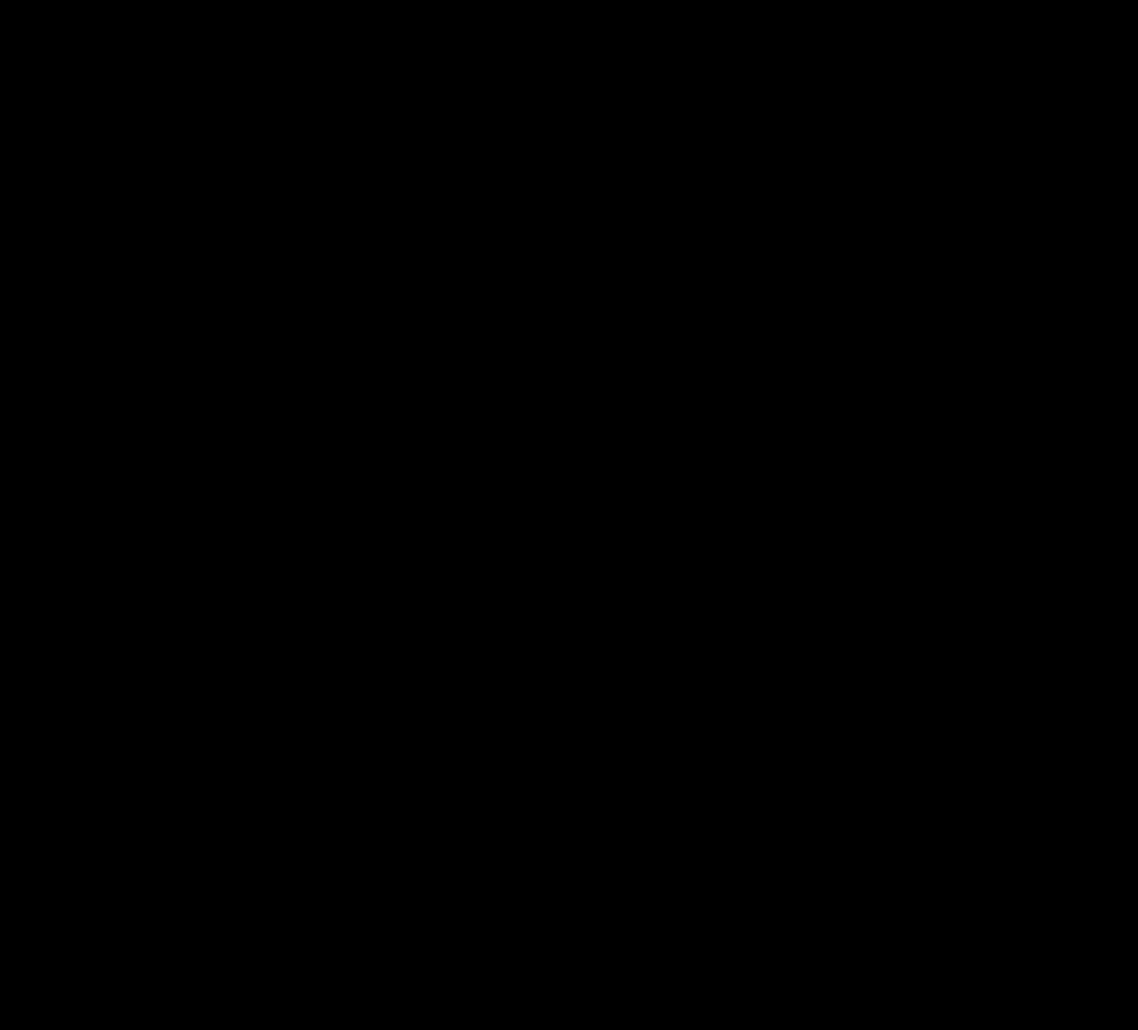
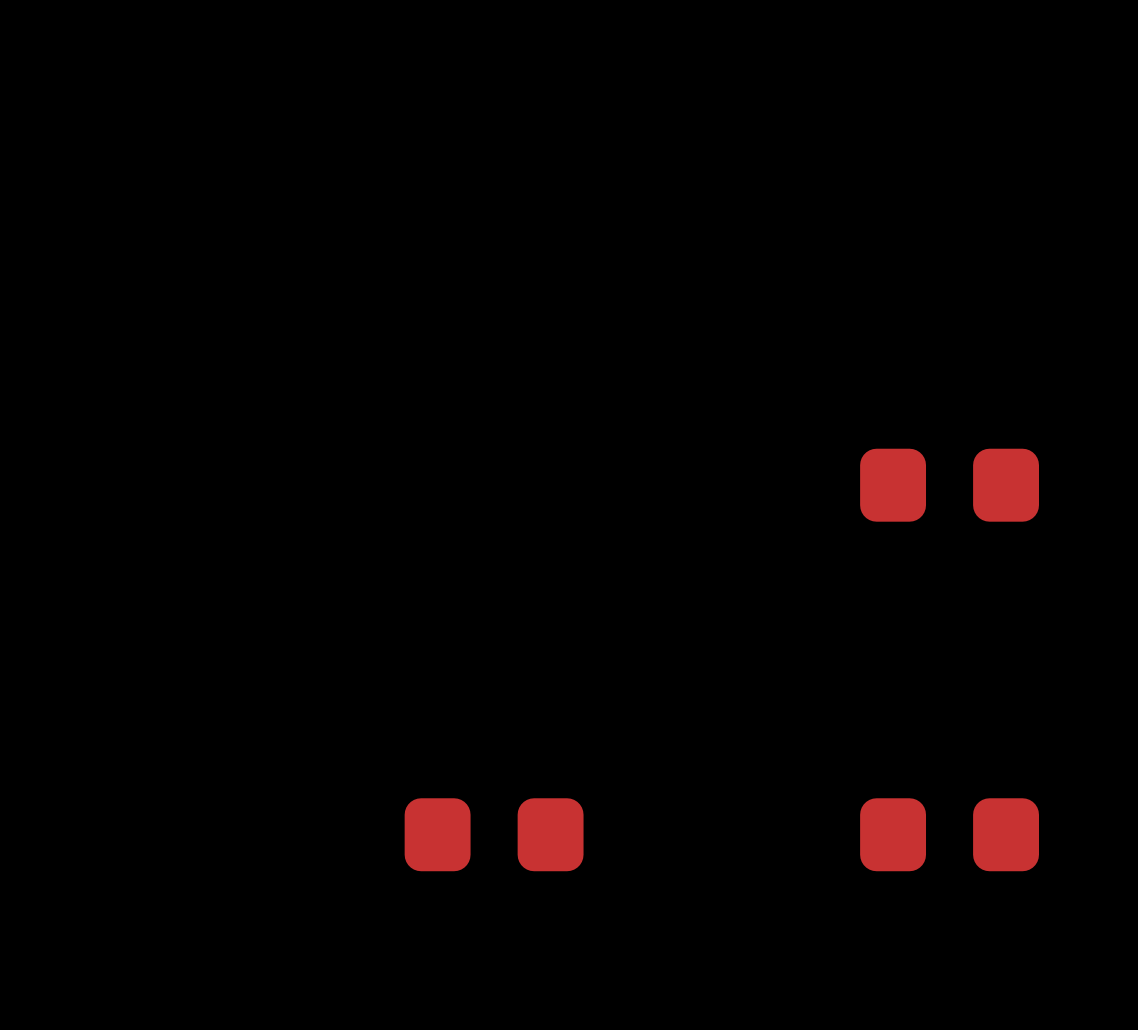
part: none -> (949, 485)
part: none -> (494, 834)
part: none -> (949, 834)

